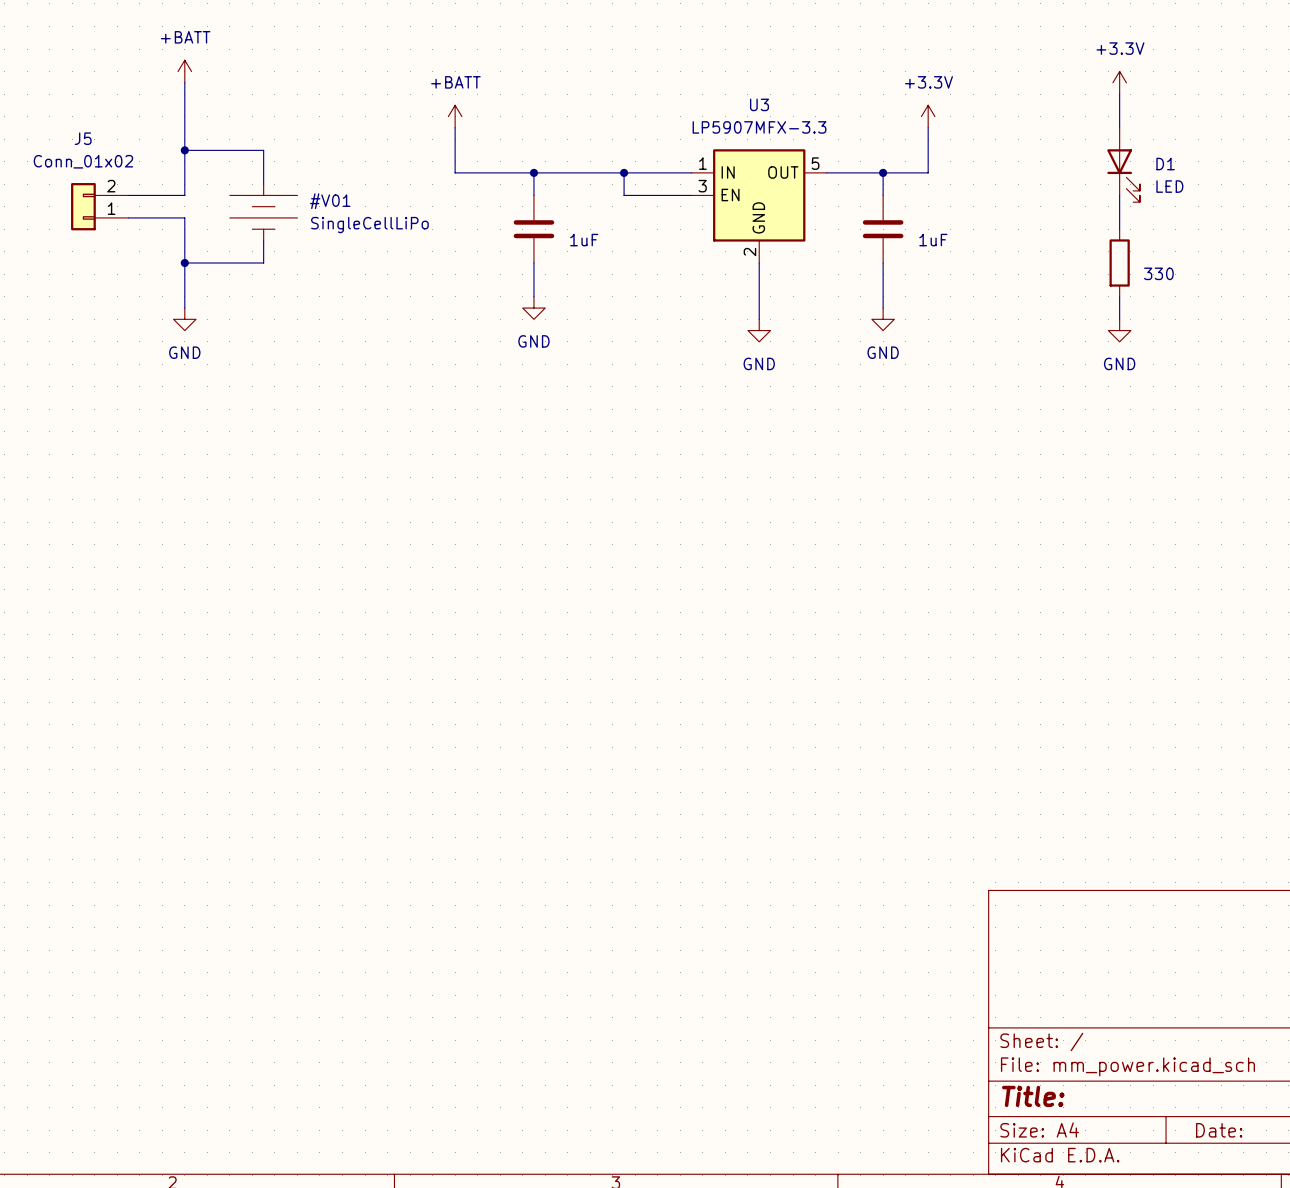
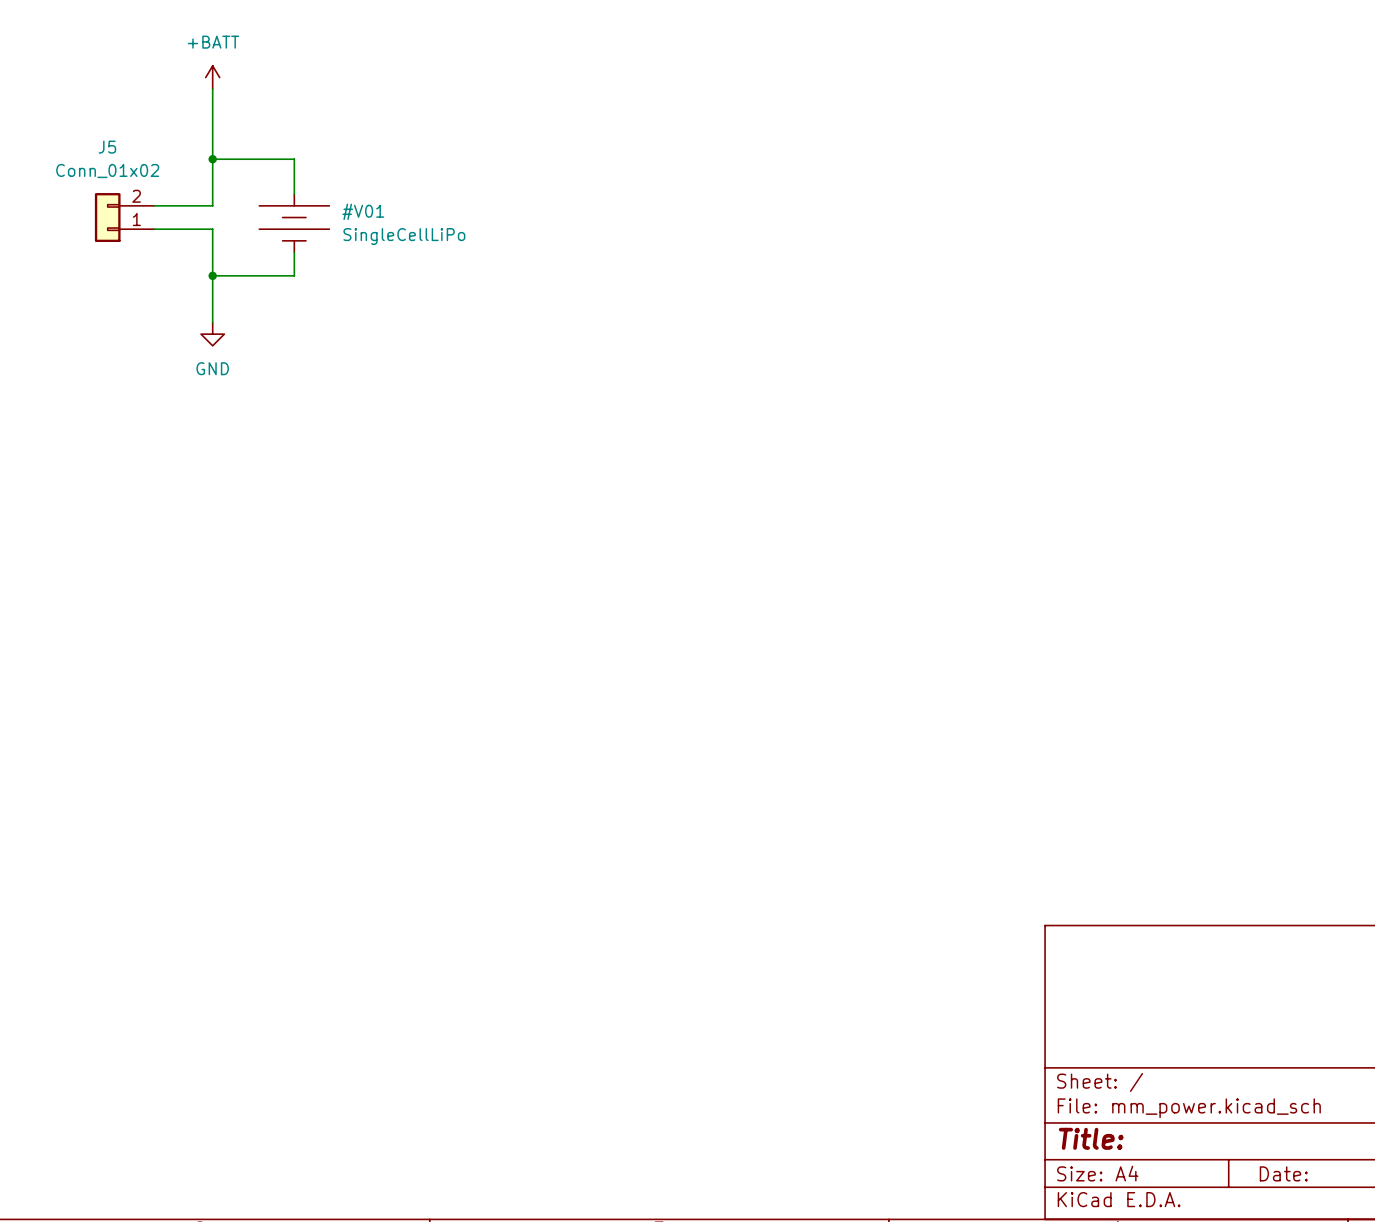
power symbol: +3.3V (1119, 82) -> none
wire: (1119, 94) (1119, 127) -> none
power symbol: +BATT (455, 116) -> none
power symbol: +3.3V (928, 116) -> none
wire: (455, 127) (455, 172) (691, 172) -> none
wire: (928, 127) (928, 172) (826, 172) -> none
D1: LED (1123, 165) -> none
wire: (533, 172) (533, 195) -> none
junction: (533, 172) -> none
wire: (624, 172) (624, 195) (691, 195) -> none
junction: (624, 172) -> none
wire: (883, 172) (883, 195) -> none
junction: (883, 172) -> none
wire: (1119, 195) (1119, 229) -> none
U3: LP5907MFX-3.3 (759, 206) -> none
part: 1uF (533, 229) -> none
part: 1uF (883, 229) -> none
wire: (533, 263) (533, 296) -> none
wire: (759, 263) (759, 319) -> none
wire: (883, 263) (883, 308) -> none
part: 330 (1119, 263) -> none
wire: (1119, 296) (1119, 319) -> none
power symbol: GND (533, 308) -> none
power symbol: GND (883, 319) -> none
power symbol: GND (759, 330) -> none
power symbol: GND (1119, 330) -> none

